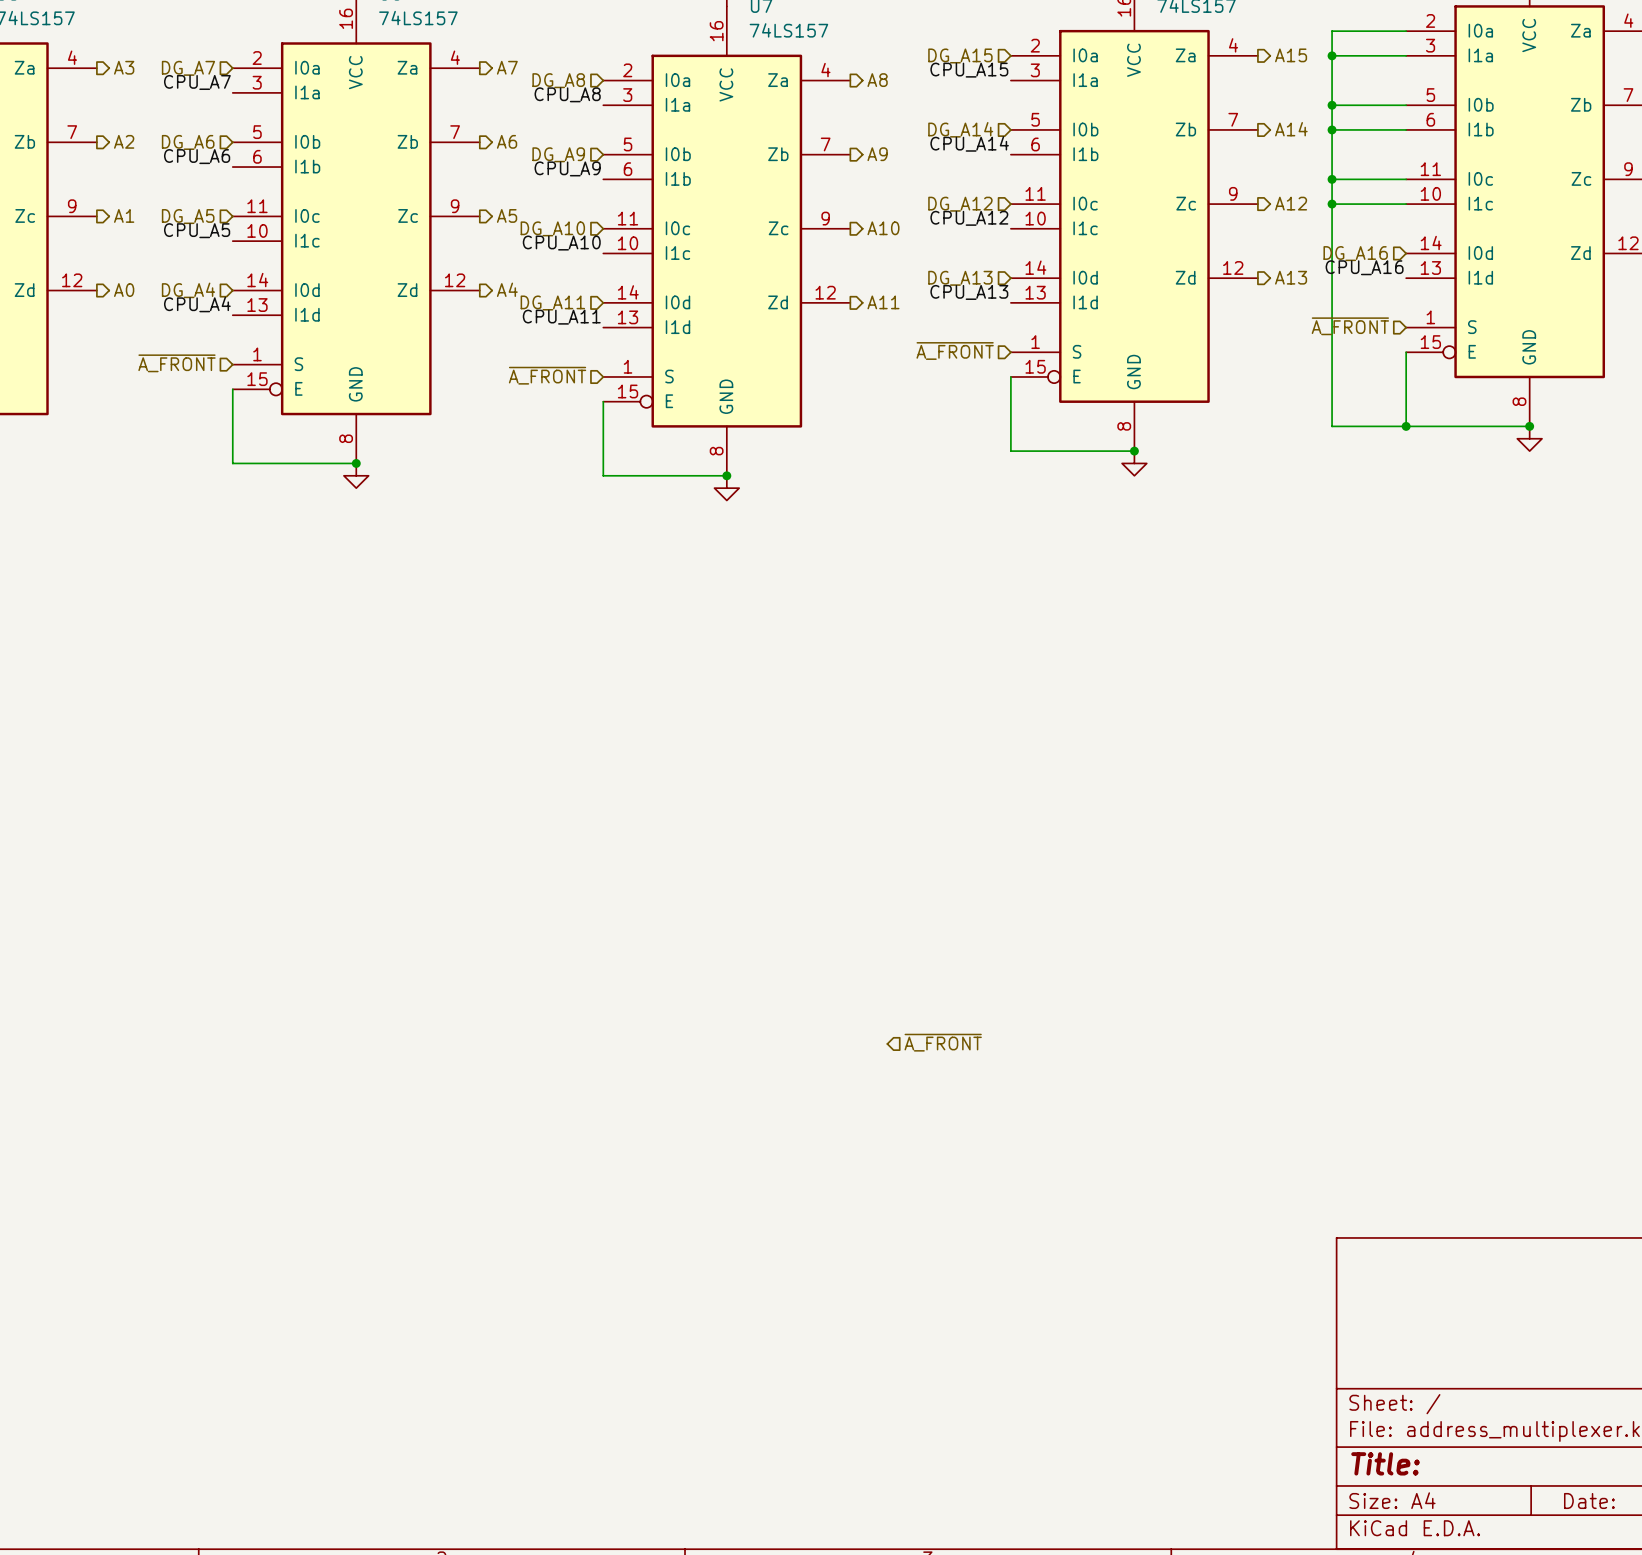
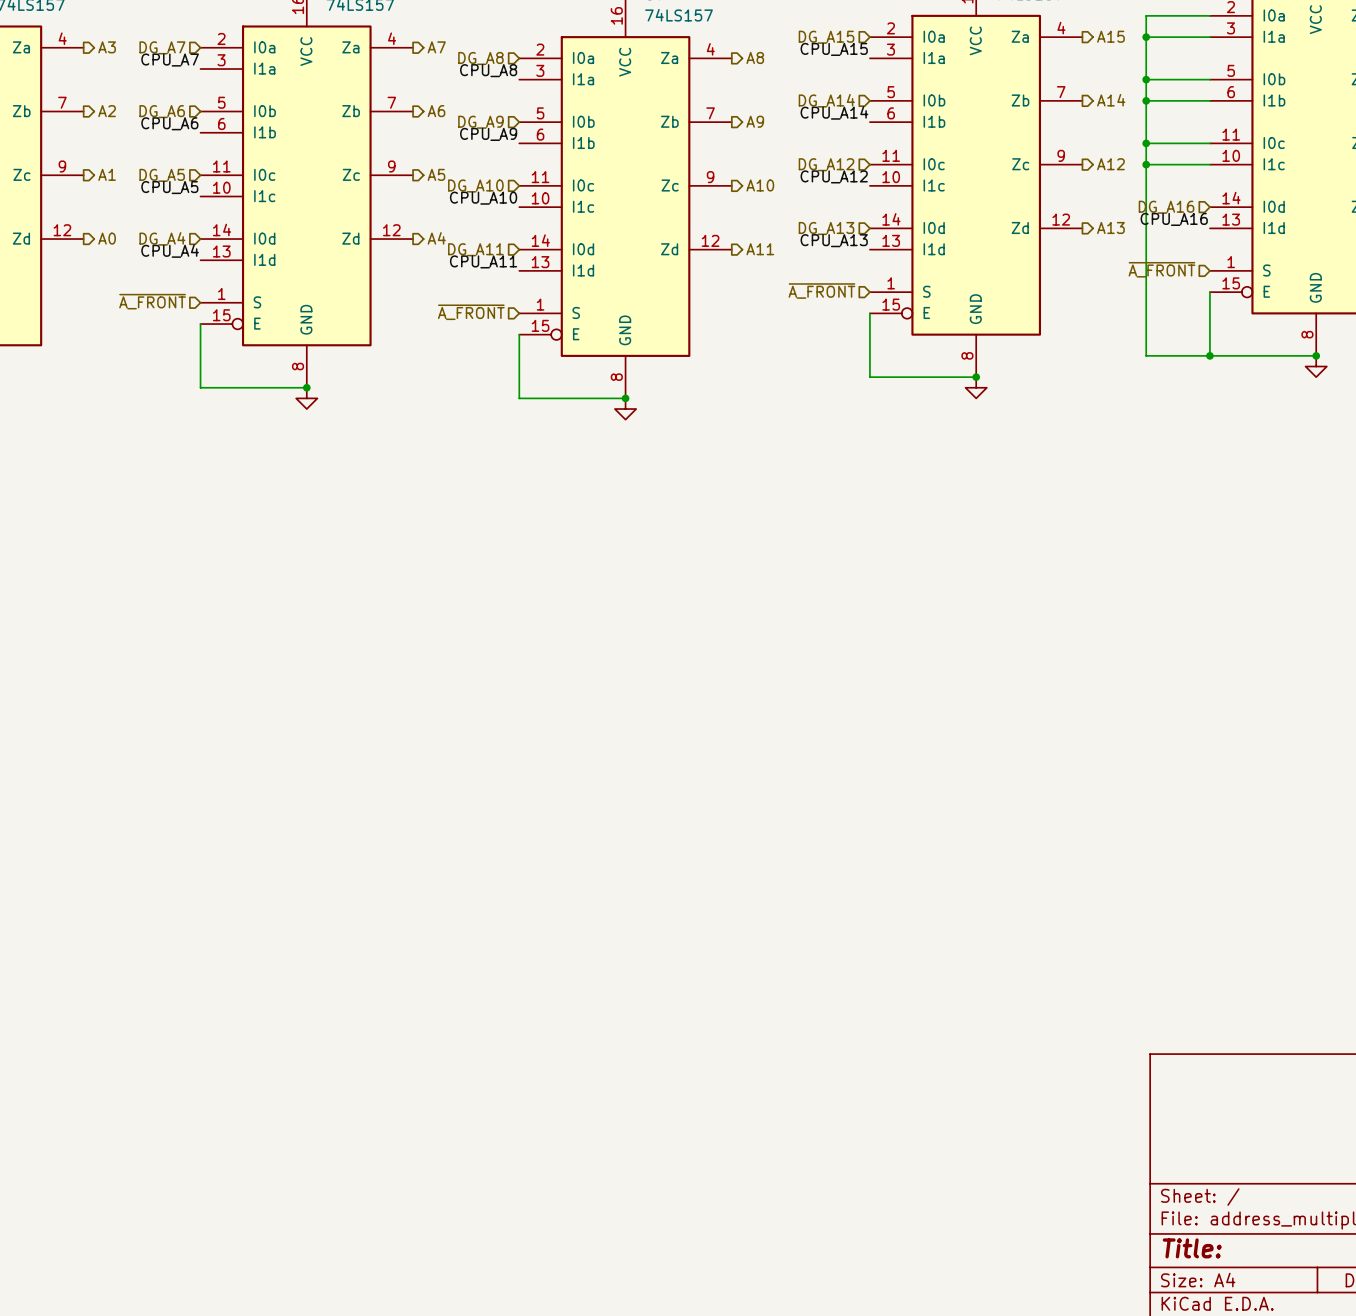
hierarchical label: ~{A_FRONT} (943, 1042) -> none

